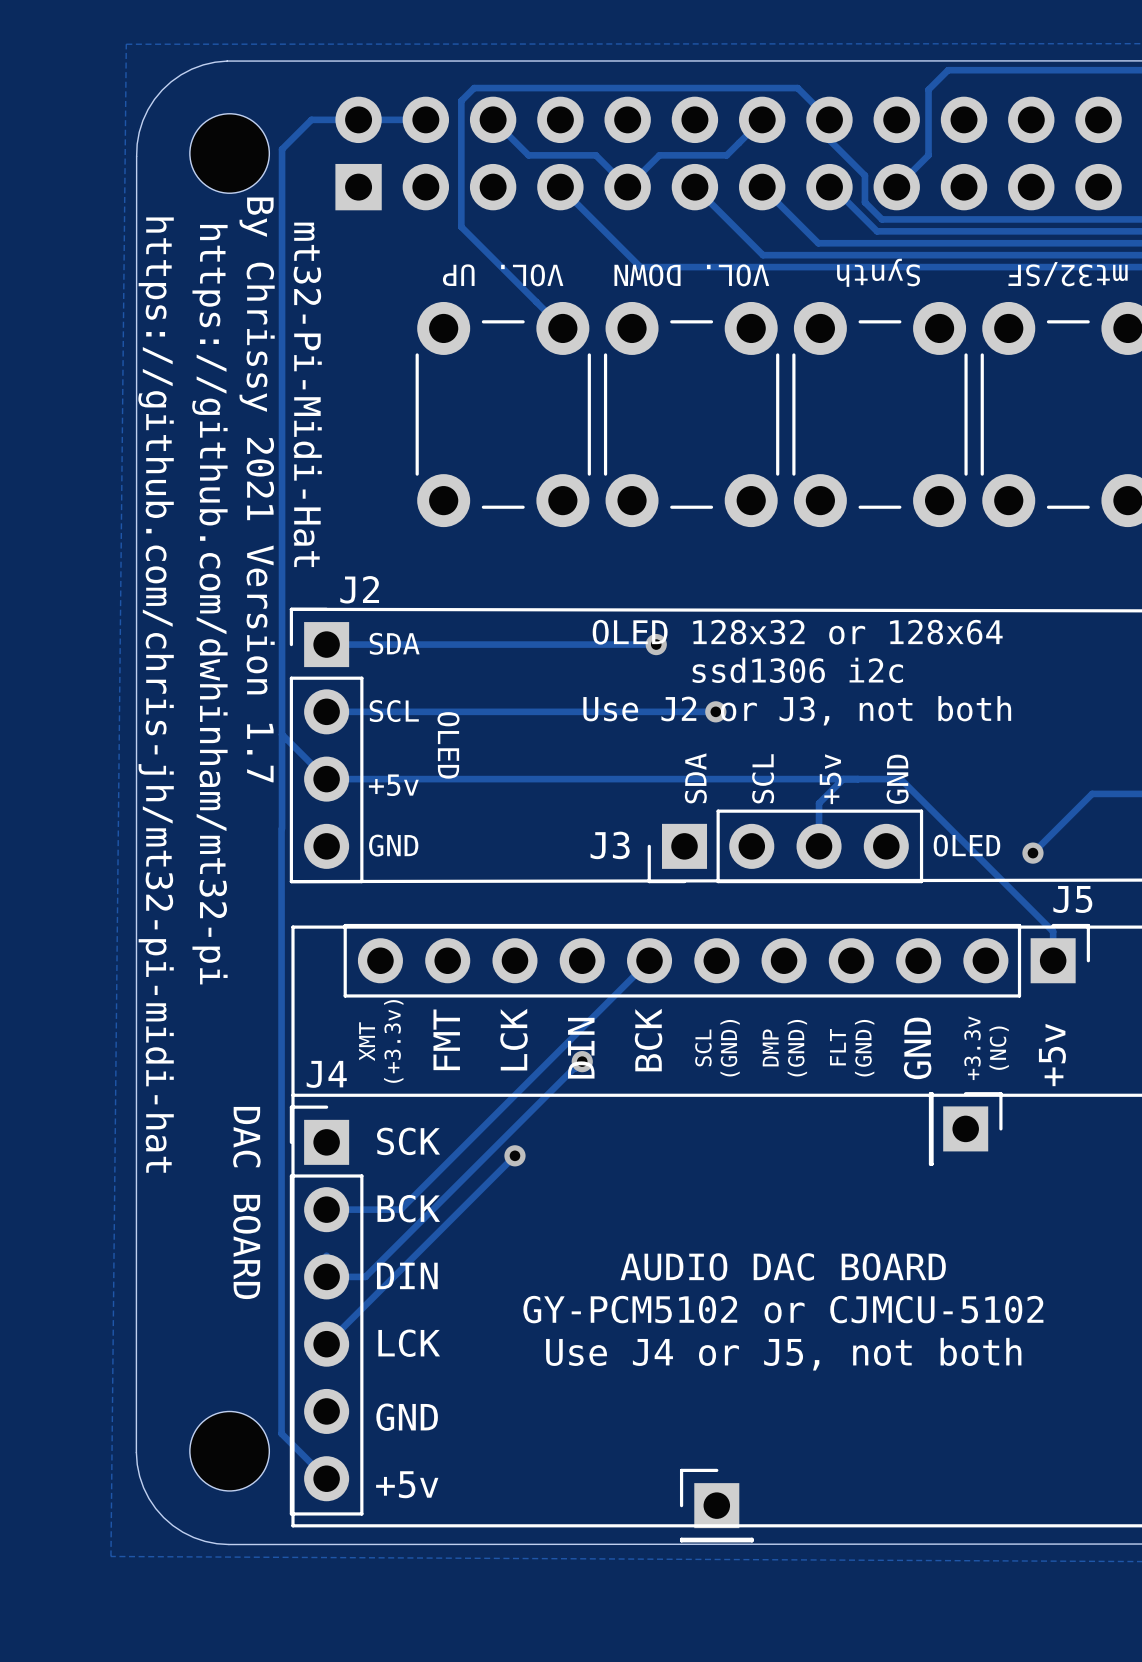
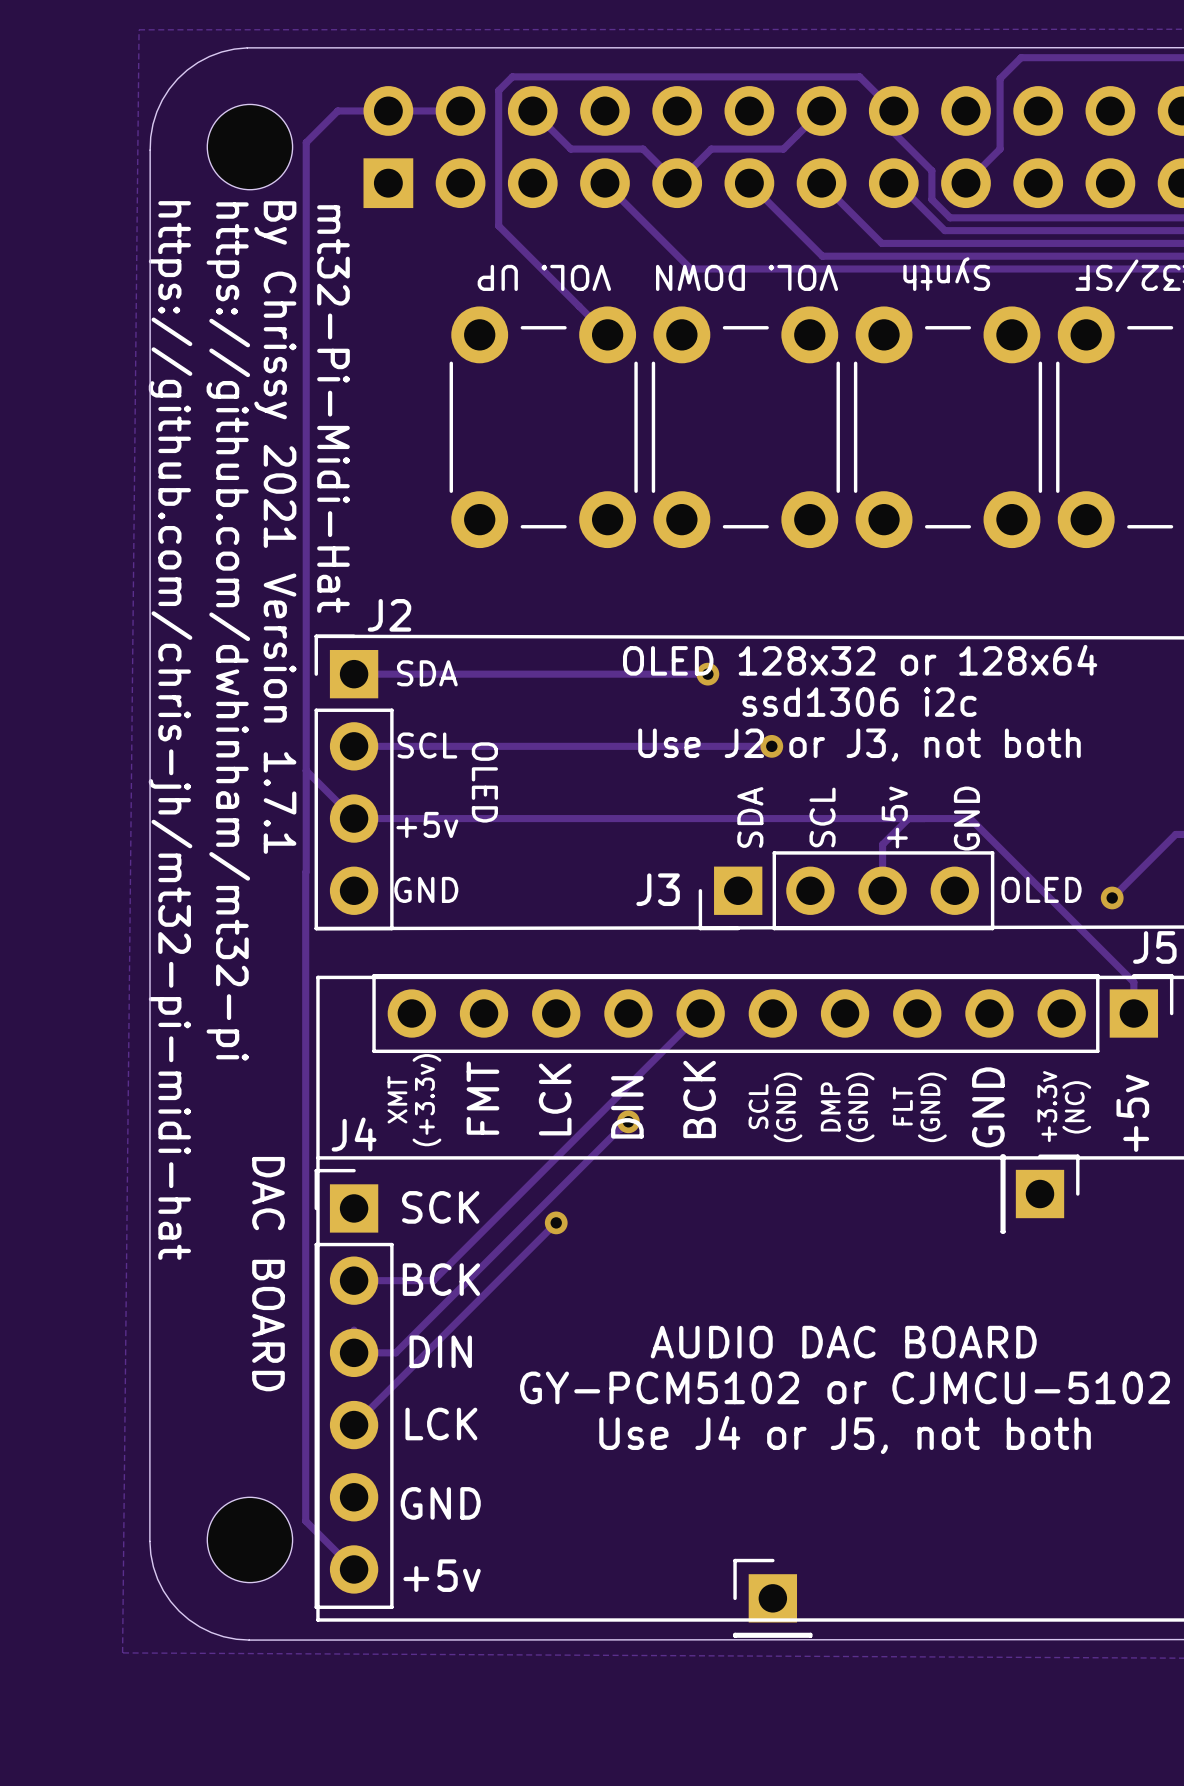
text: By Chrissy 2021 Version 1.7 (257, 489) -> By Chrissy 2021 Version 1.7.1 (275, 527)

